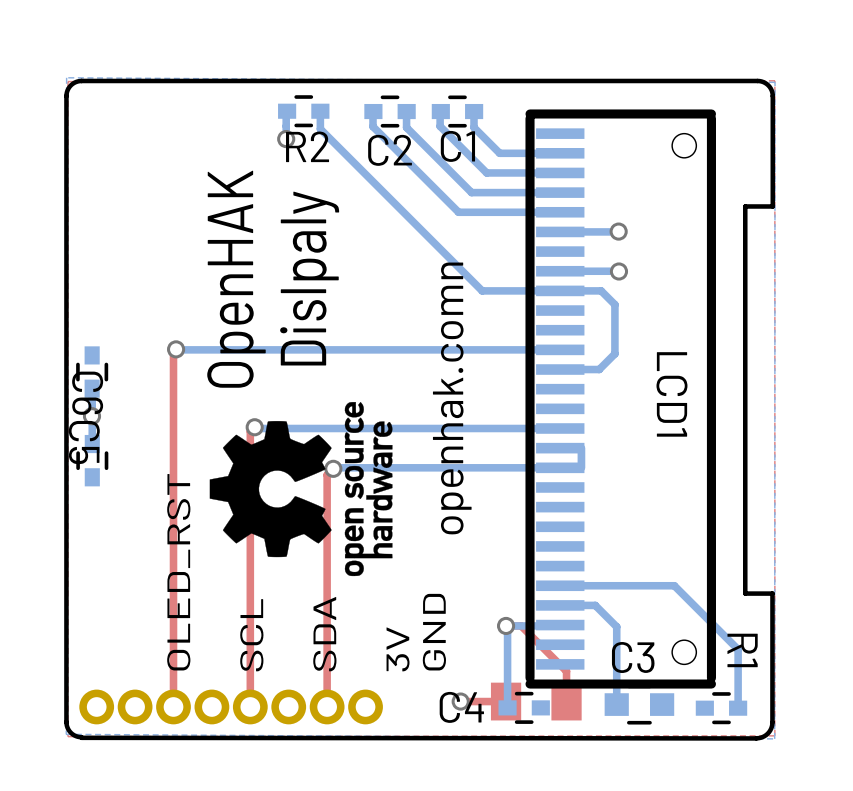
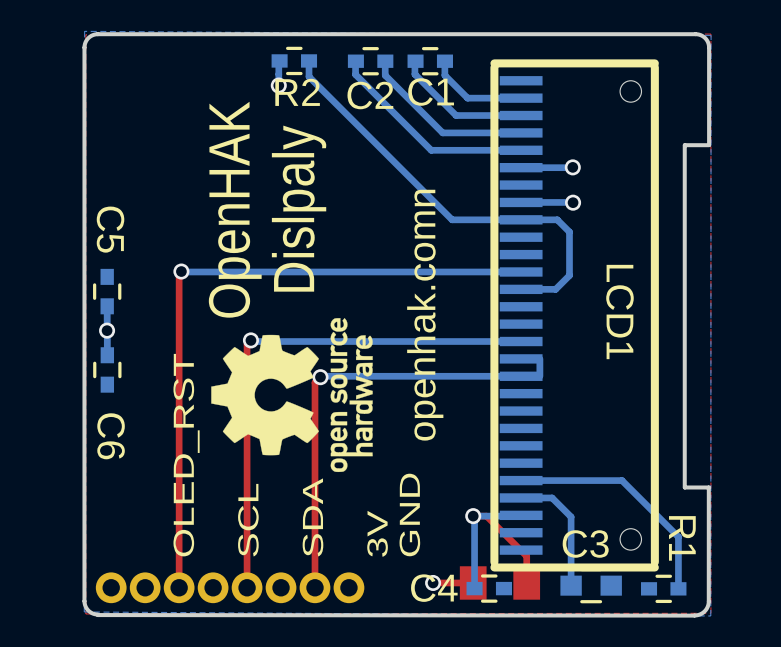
C6 name position: C6 (87, 393) -> C6 (111, 436)
C5 name position: C5 (84, 442) -> C5 (110, 229)

